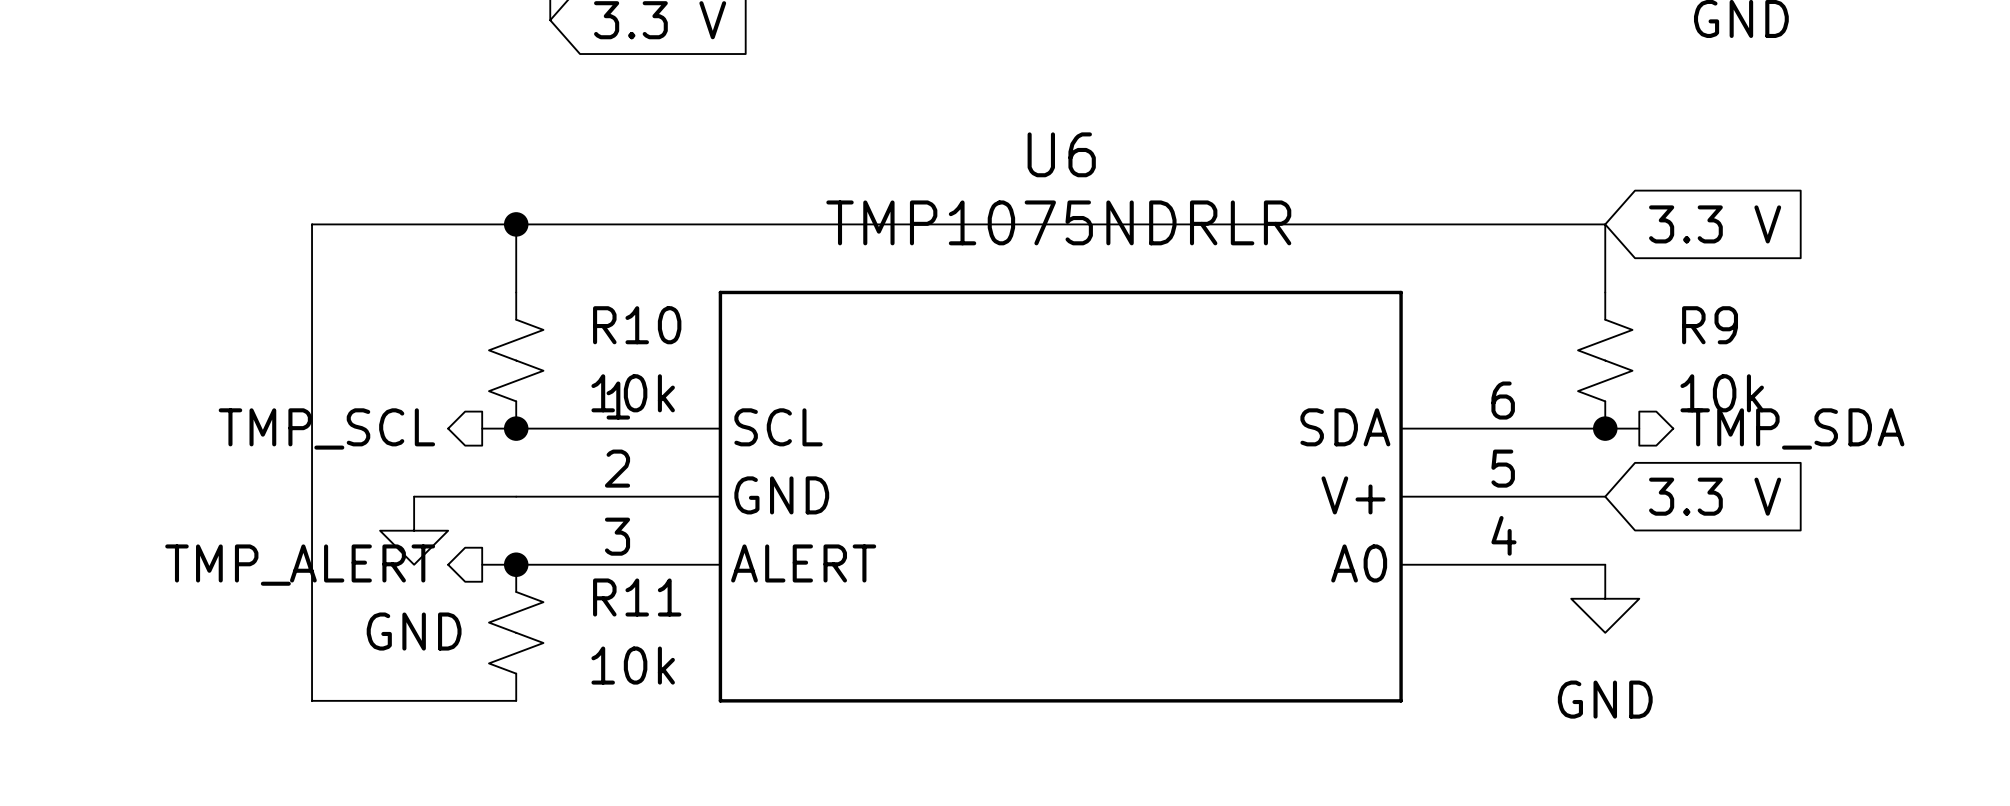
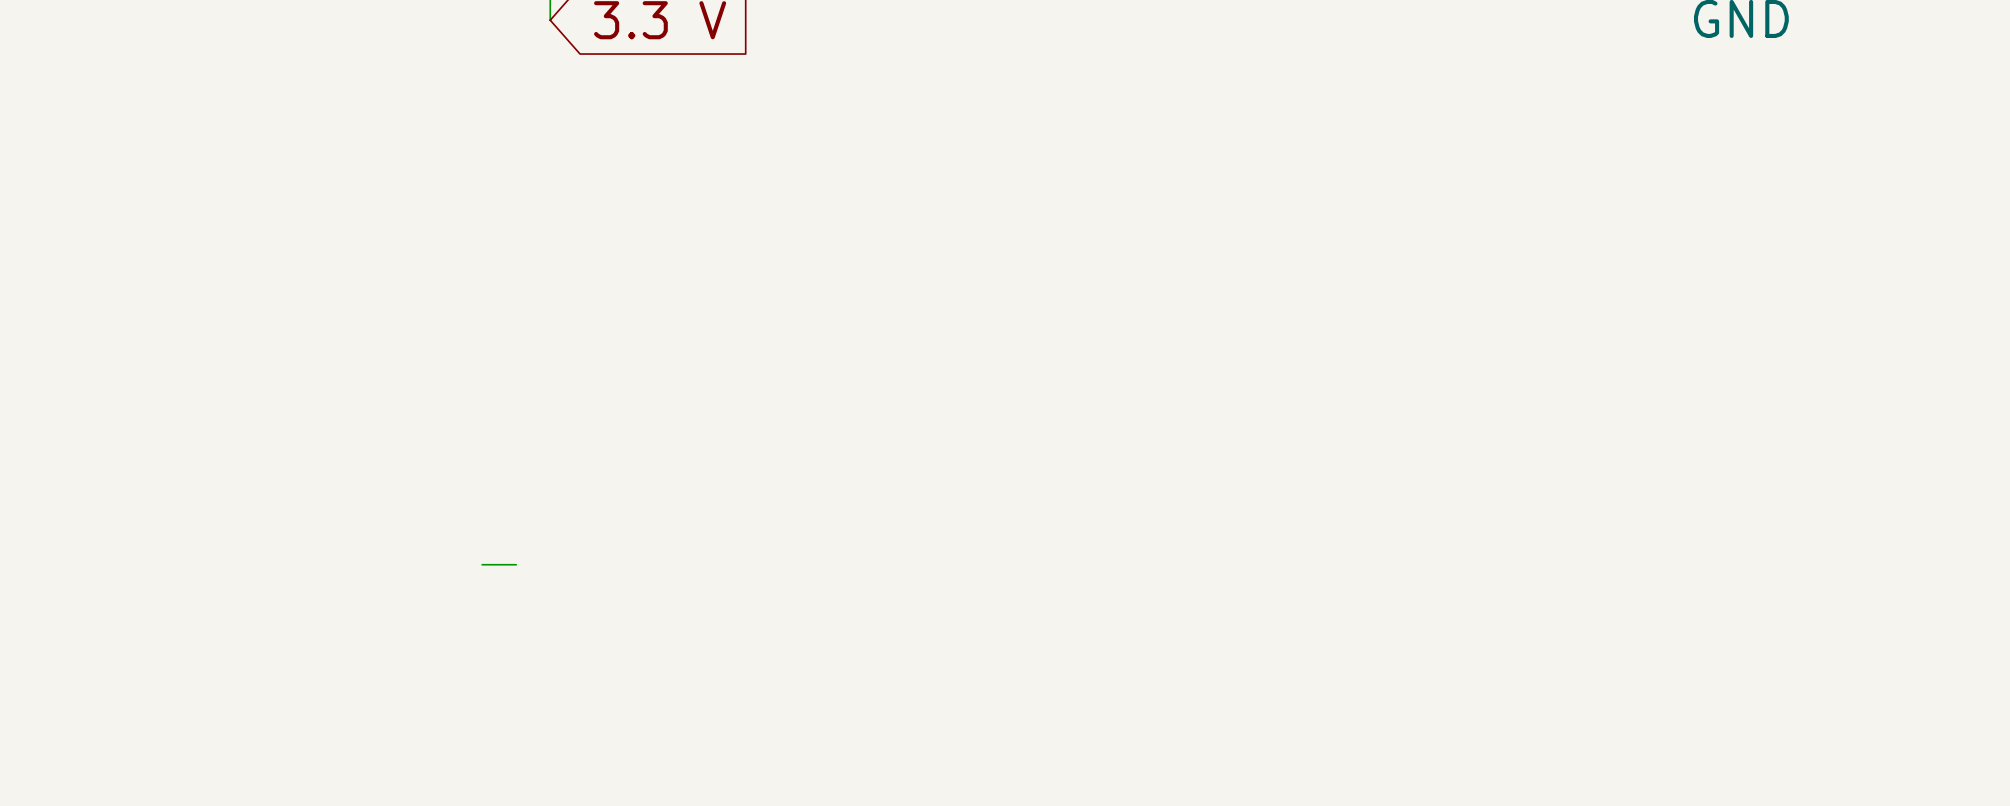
wire: (516, 224) (516, 292) -> none
junction: (516, 224) -> none
global label: 3.3 V (1715, 224) -> none
wire: (1605, 292) (1605, 224) (312, 224) (312, 700) (516, 700) -> none
R10: 10k (516, 360) -> none
R9: 10k (1605, 360) -> none
hierarchical label: TMP_SCL (326, 428) -> none
wire: (482, 428) (516, 428) -> none
junction: (516, 428) -> none
wire: (1605, 428) (1639, 428) -> none
junction: (1605, 428) -> none
hierarchical label: TMP_SDA (1795, 428) -> none
wire: (414, 496) (516, 496) -> none
U6: TMP1075NDRLR (1060, 496) -> none
global label: 3.3 V (1715, 496) -> none
power symbol: GND (414, 530) -> none
junction: (516, 564) -> none
hierarchical label: TMP_ALERT (300, 565) -> none
power symbol: GND (1605, 598) -> none
R11: 10k (516, 632) -> none

